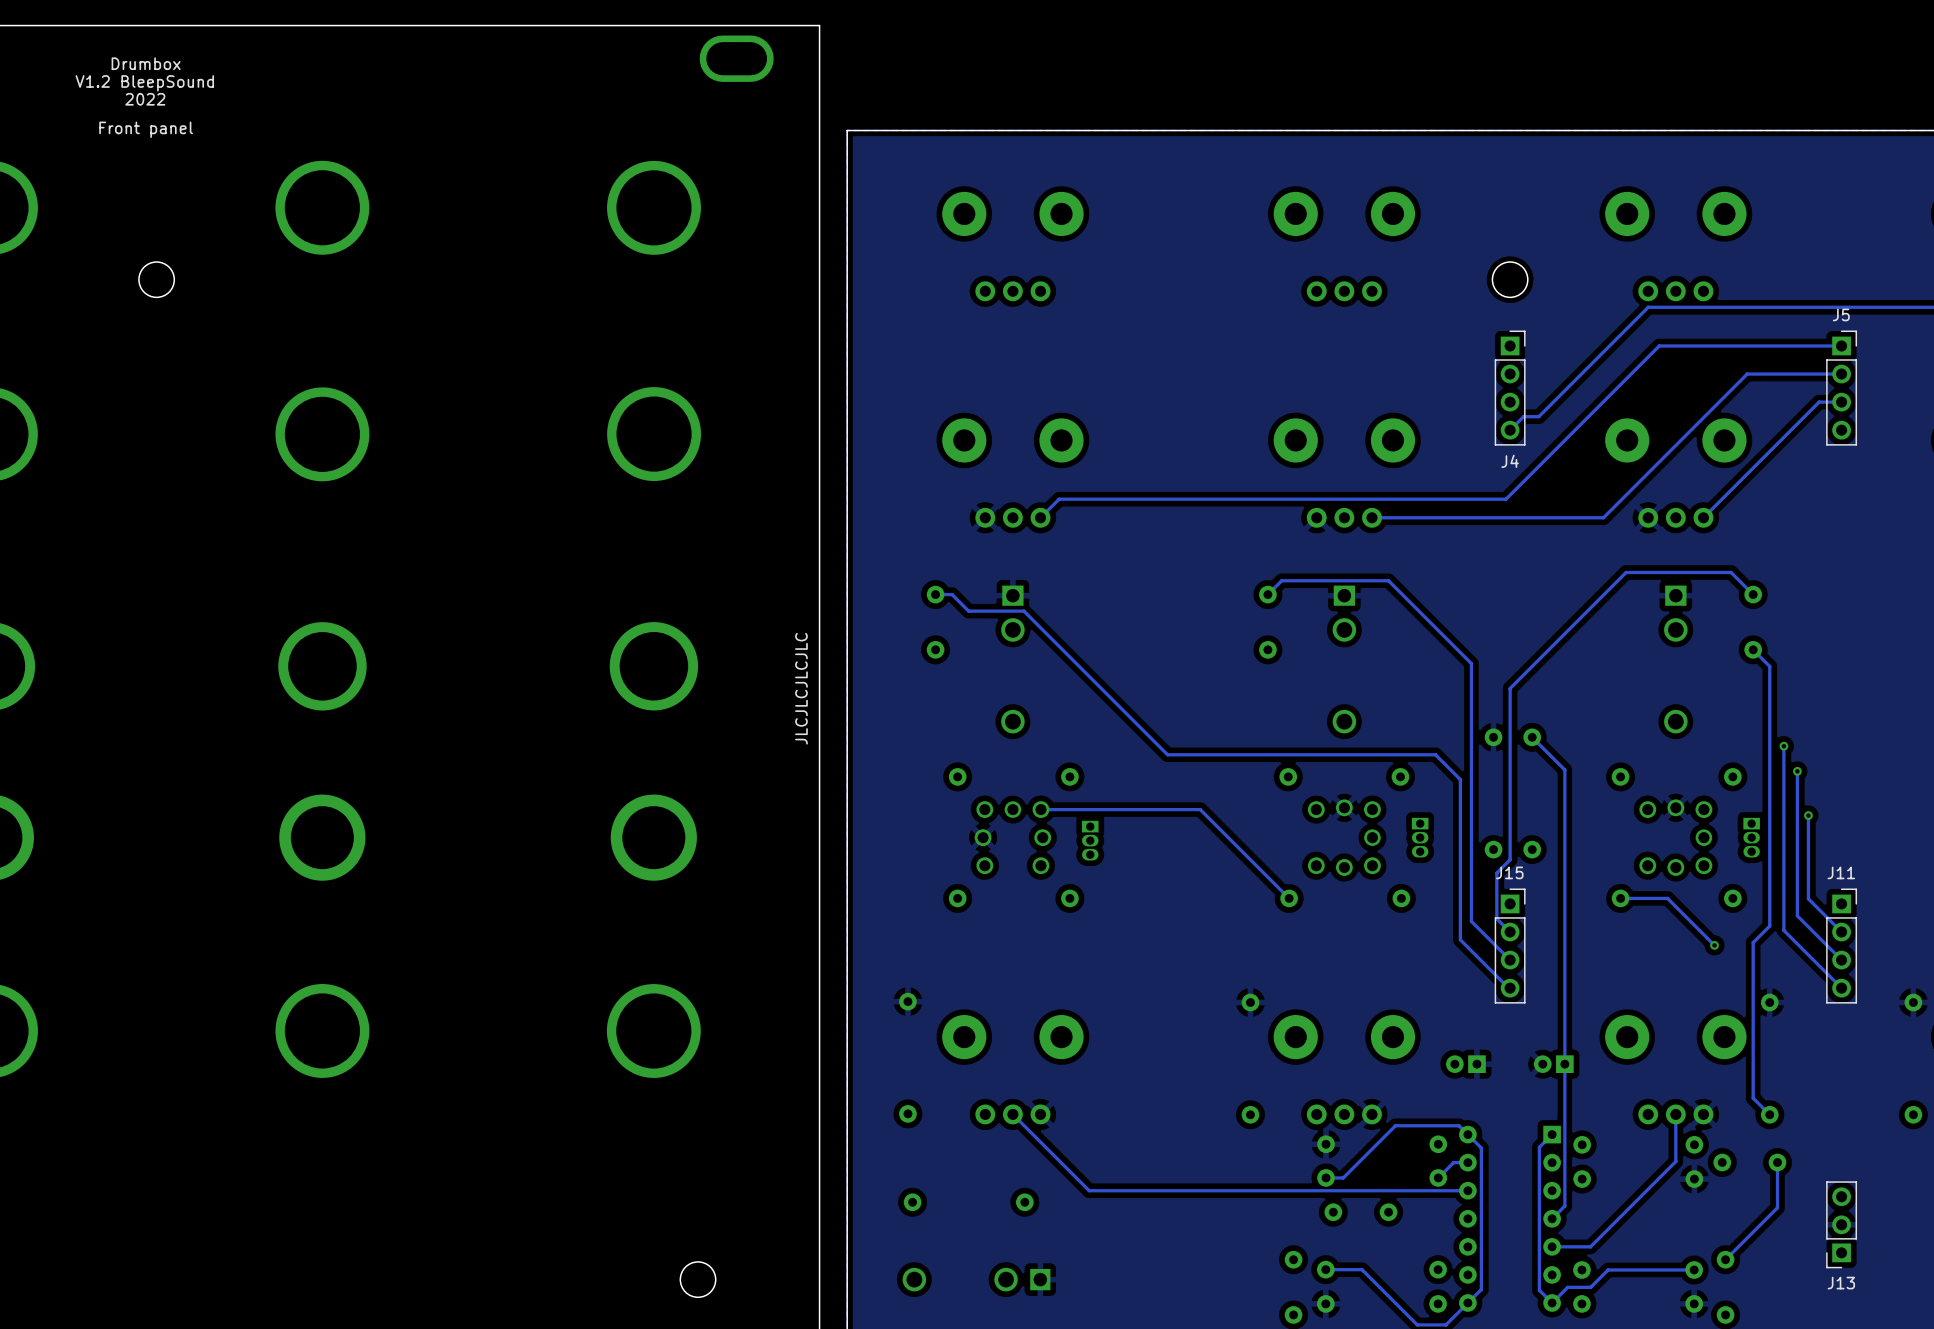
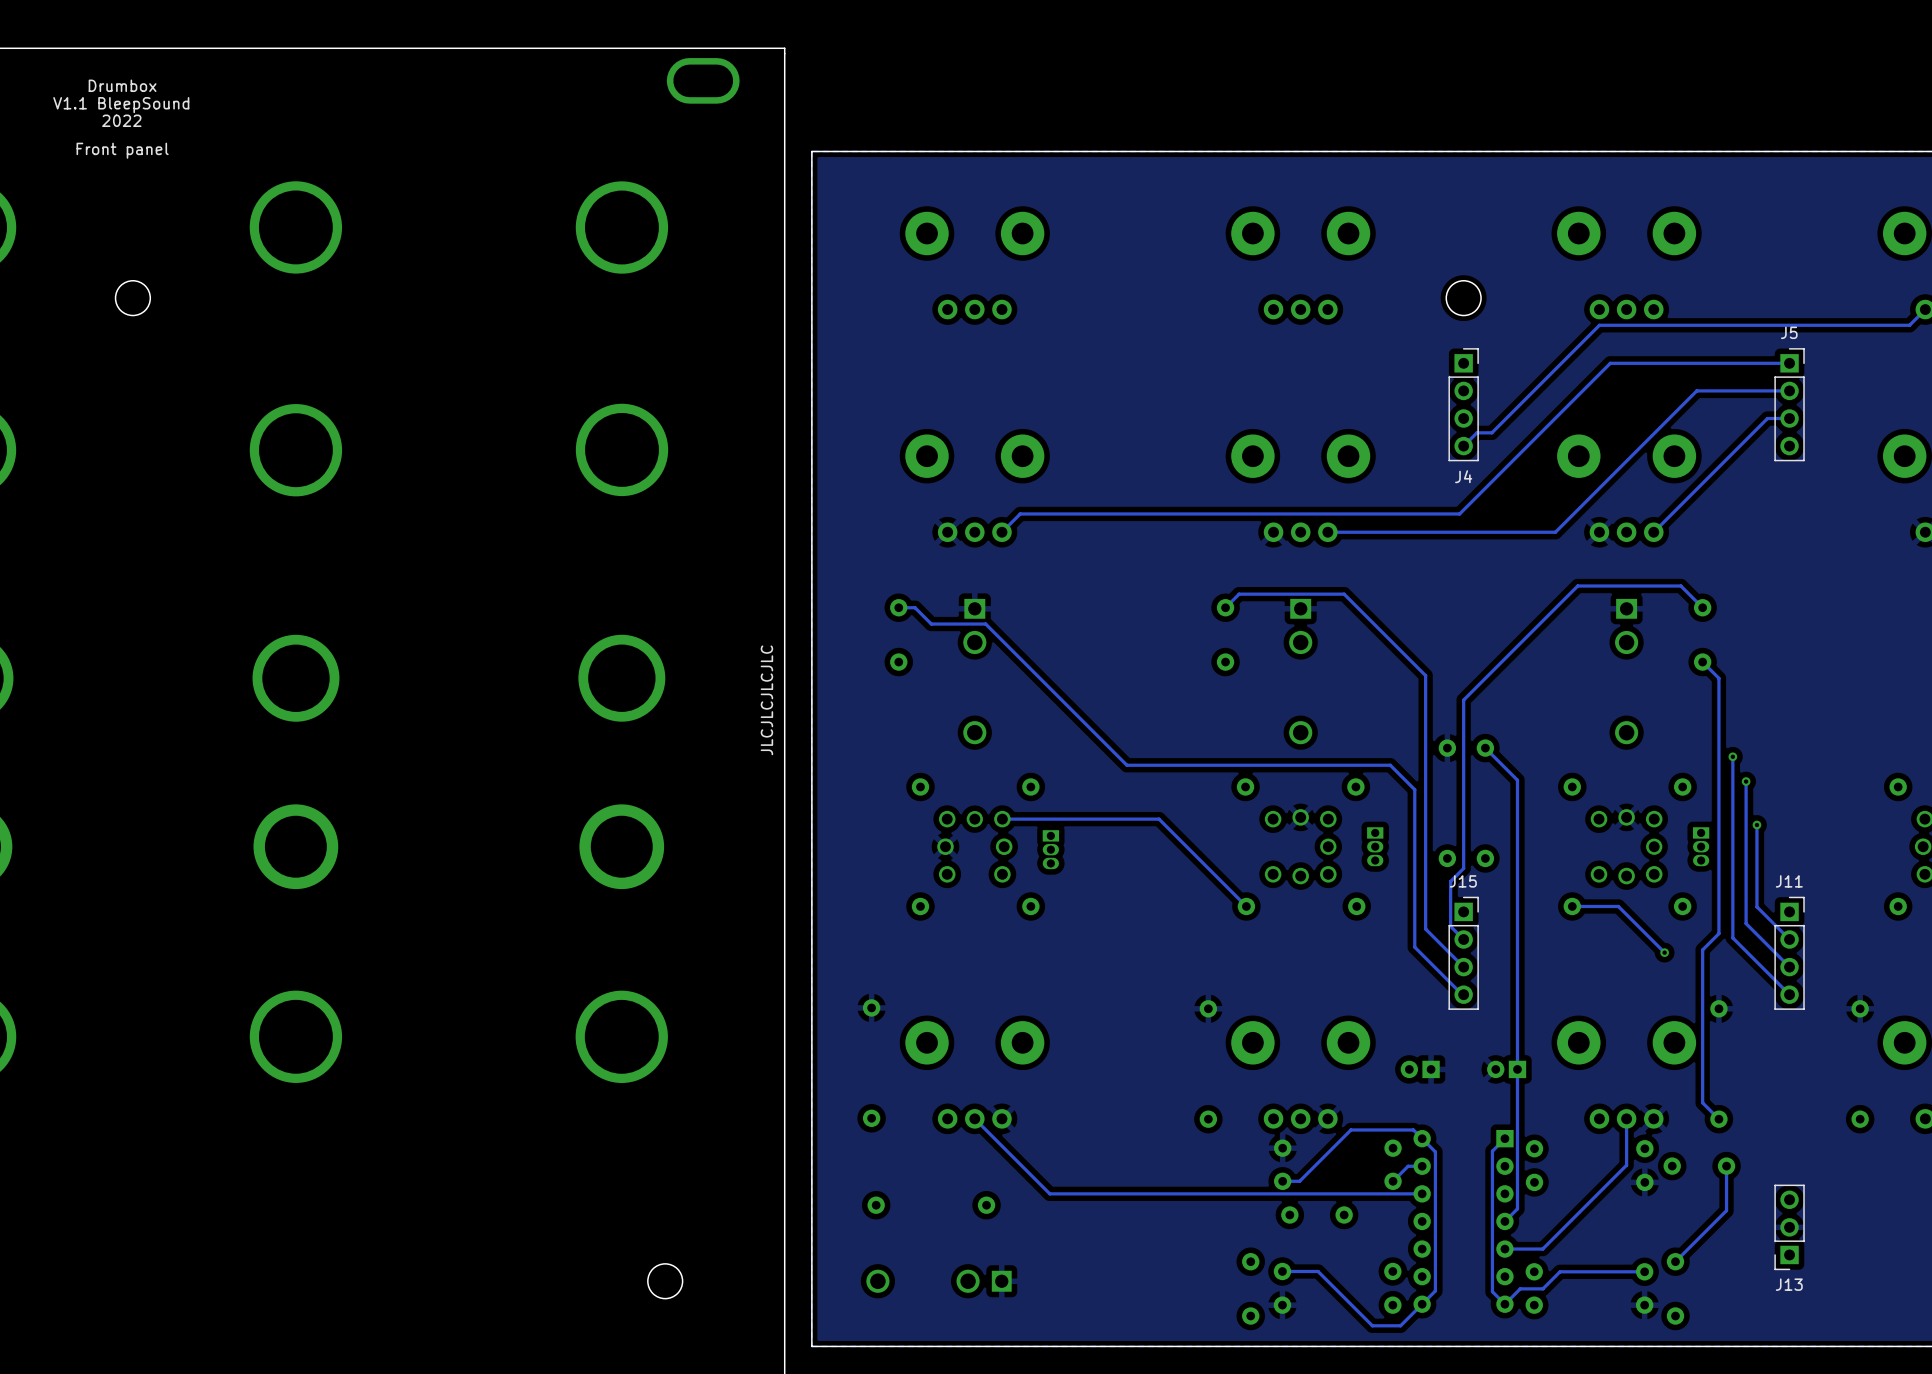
text: V1.2 BleepSound (144, 83) -> V1.1 BleepSound (121, 105)

